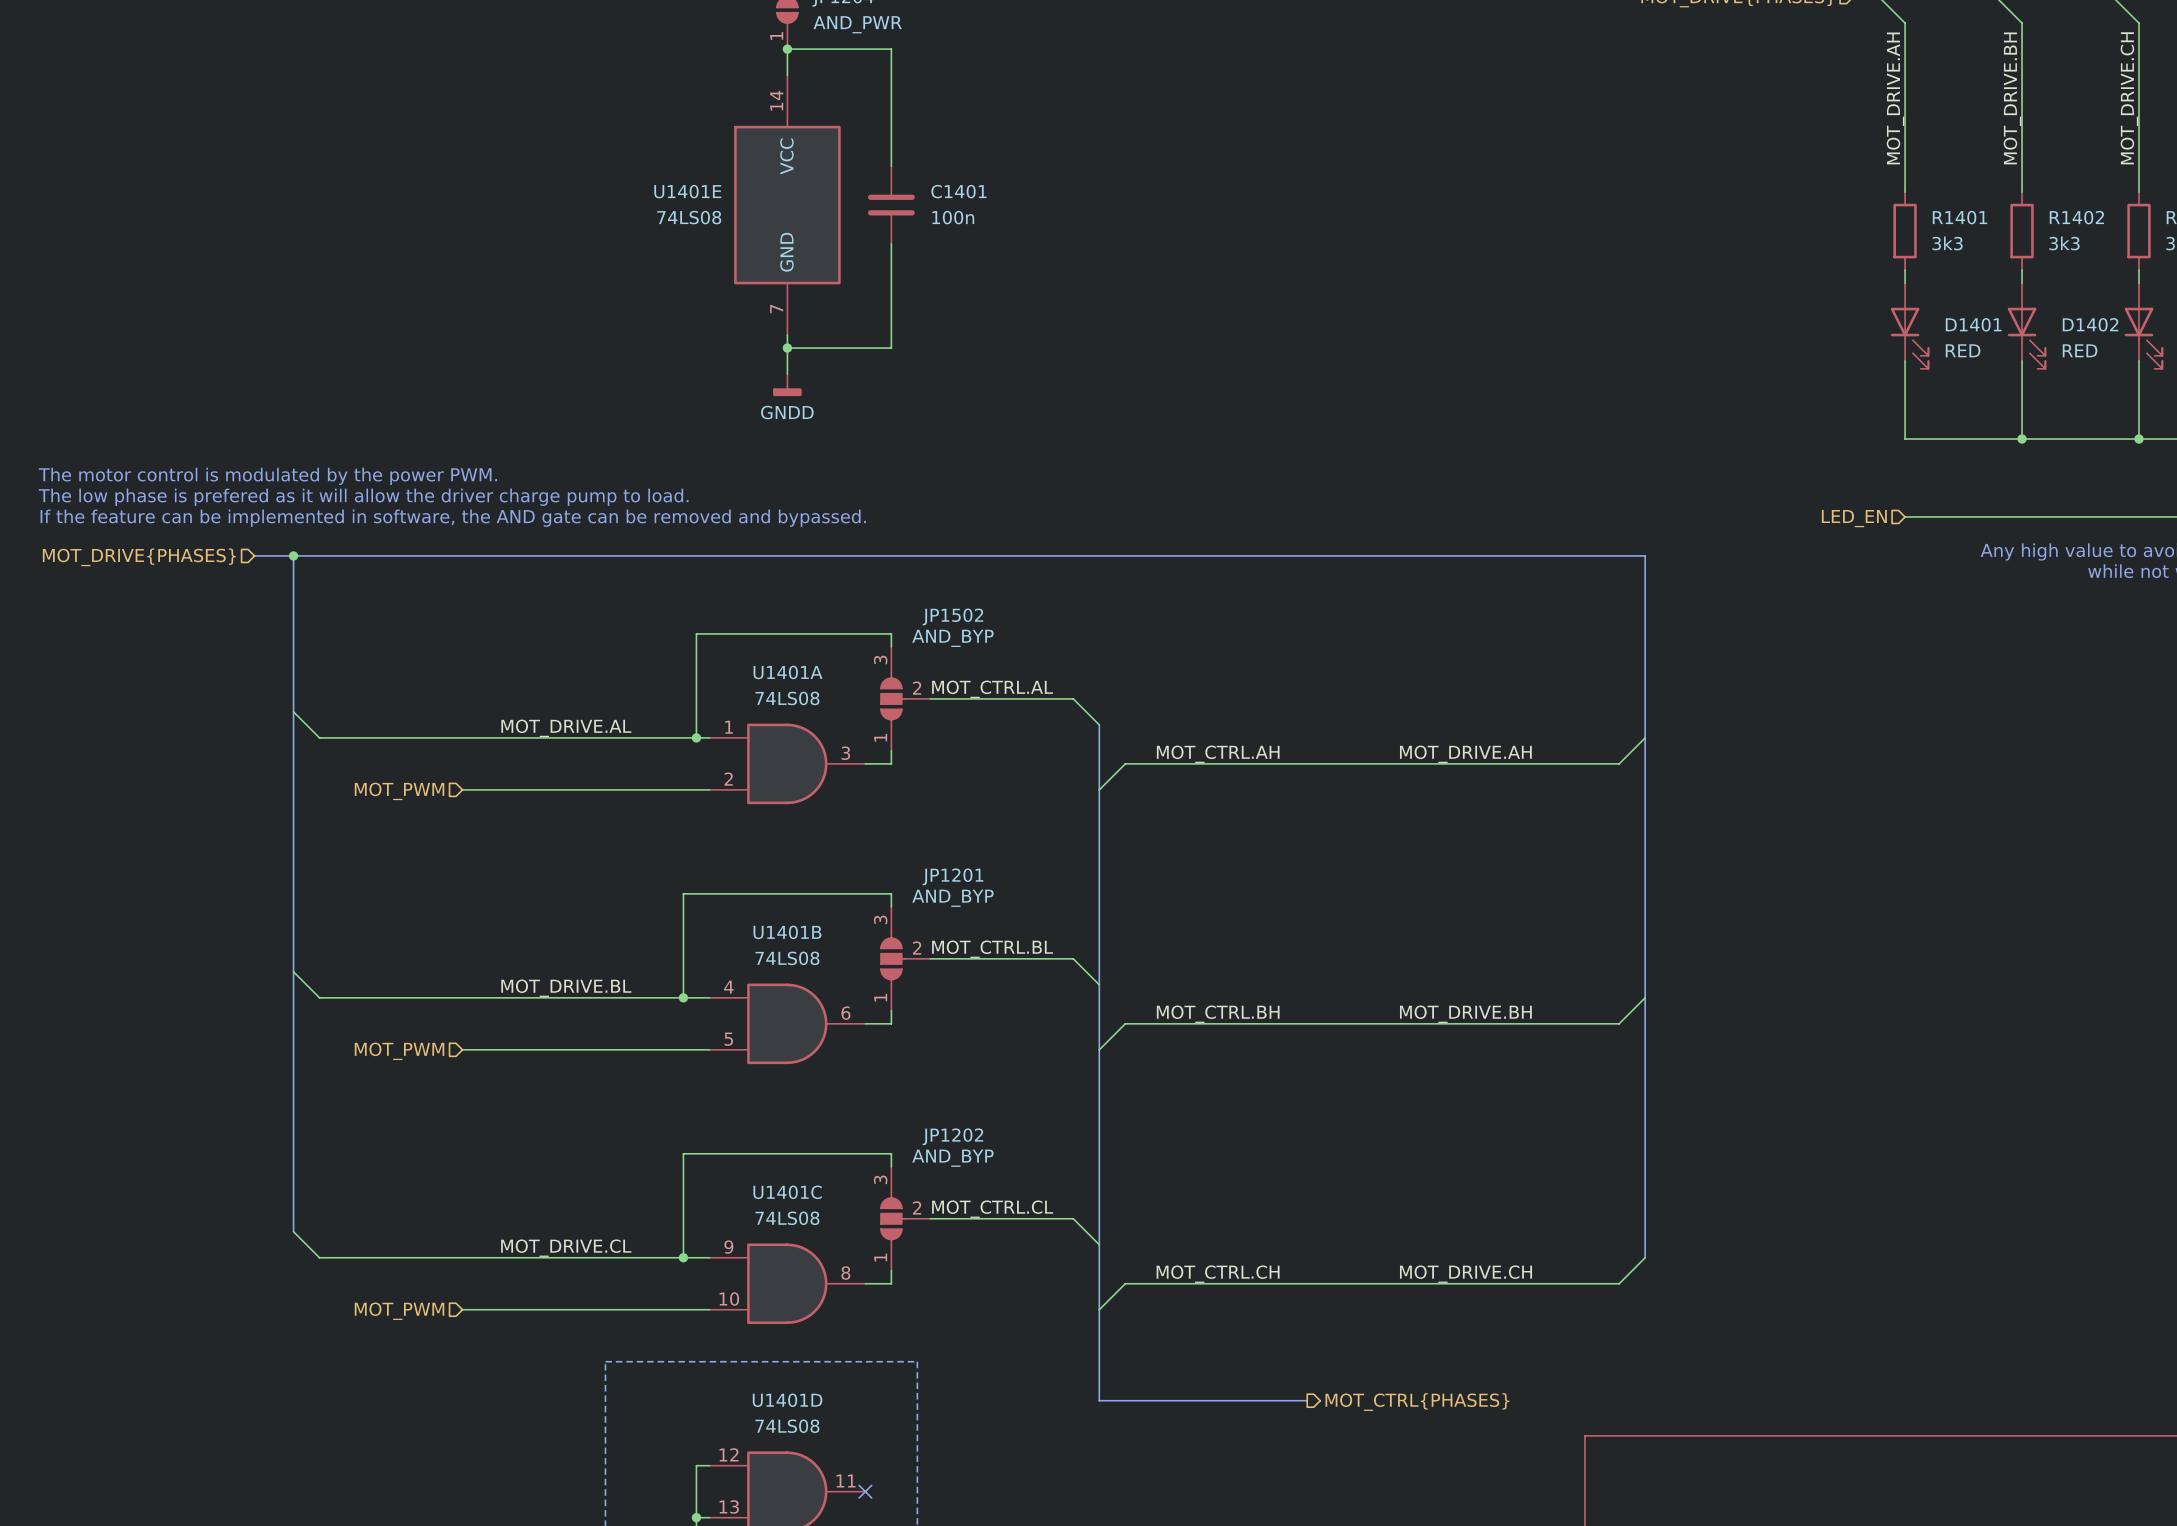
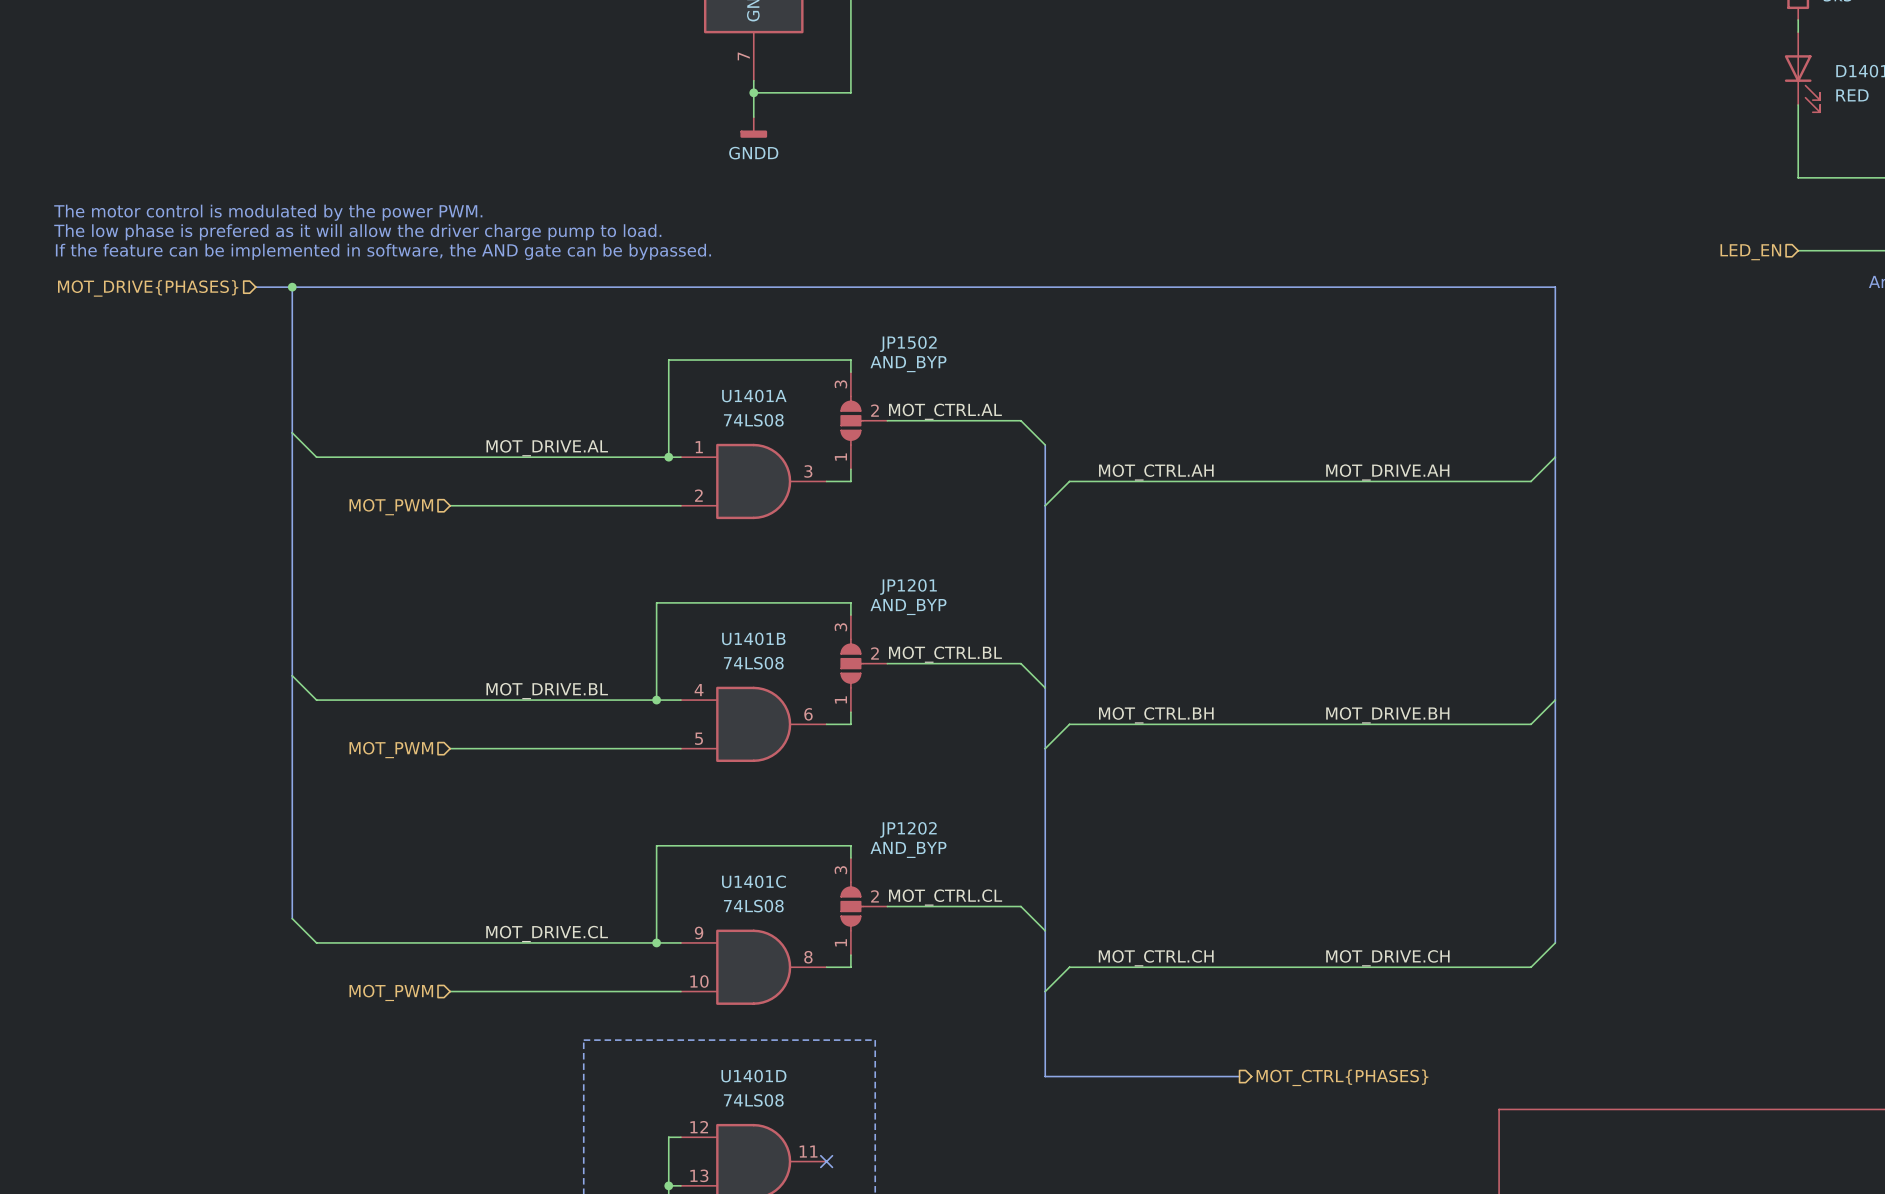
text: If the feature can be implemented in software, the AND gate can be removed and bypassed. (453, 518) -> If the feature can be implemented in software, the AND gate can be bypassed. (383, 251)

